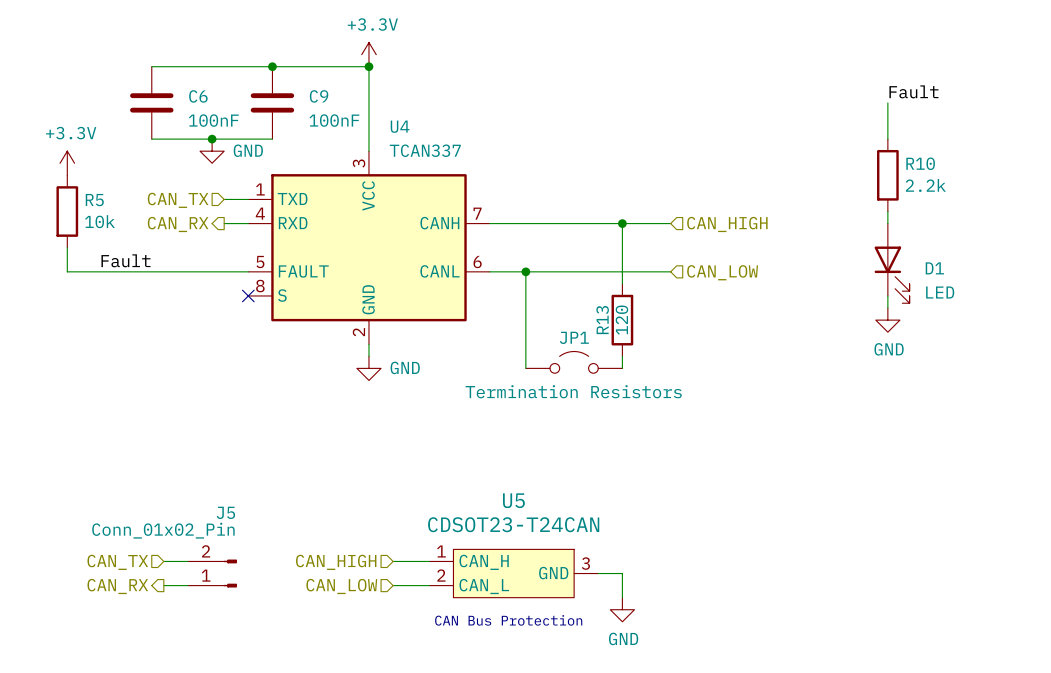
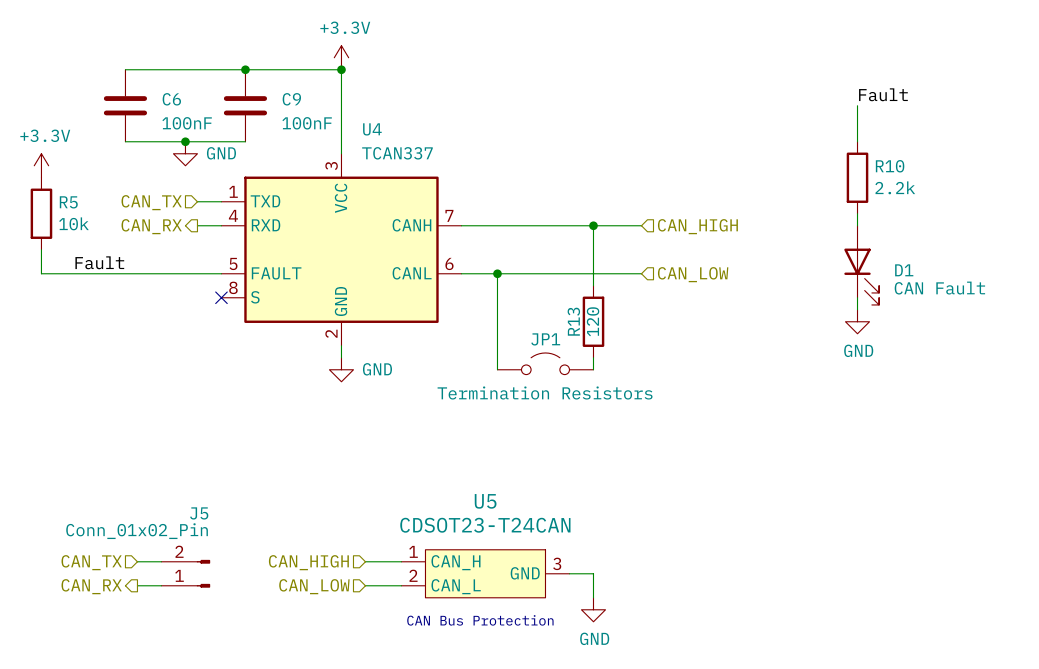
D1 value: LED (940, 292) -> CAN Fault (939, 288)

